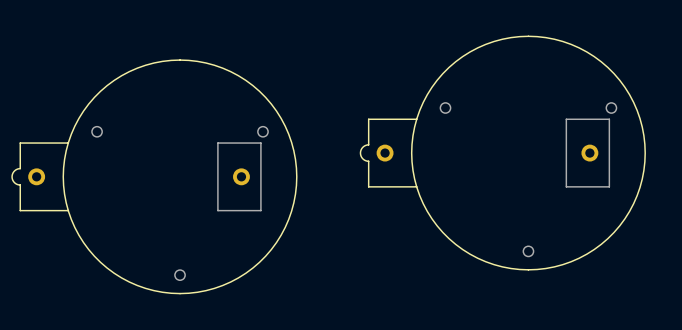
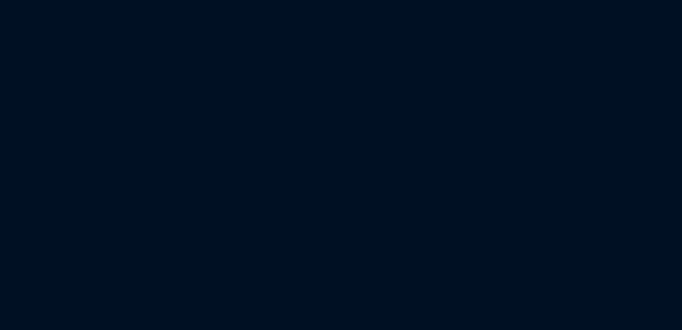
part: (502, 153) -> none
part: (154, 176) -> none

